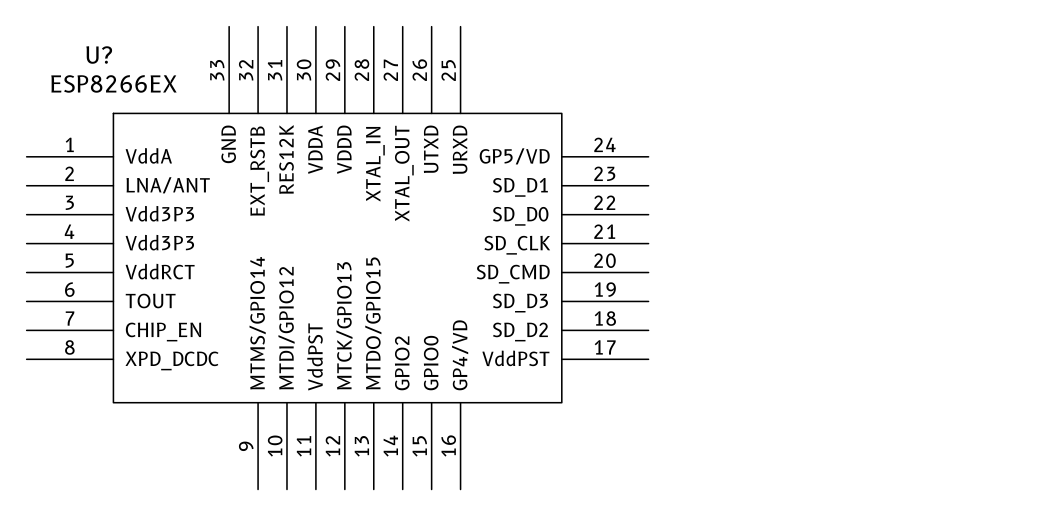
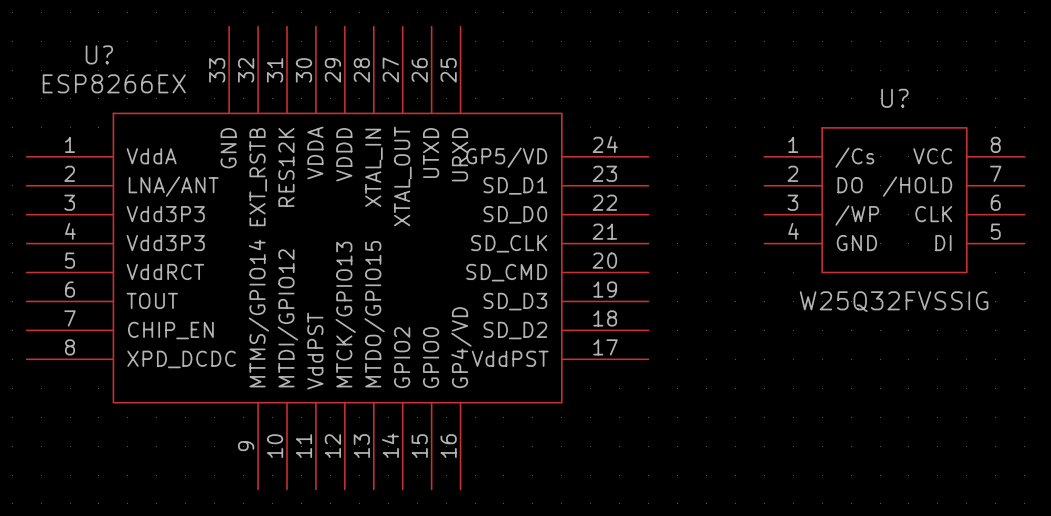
U?: none -> W25Q32FVSSIG (894, 200)

